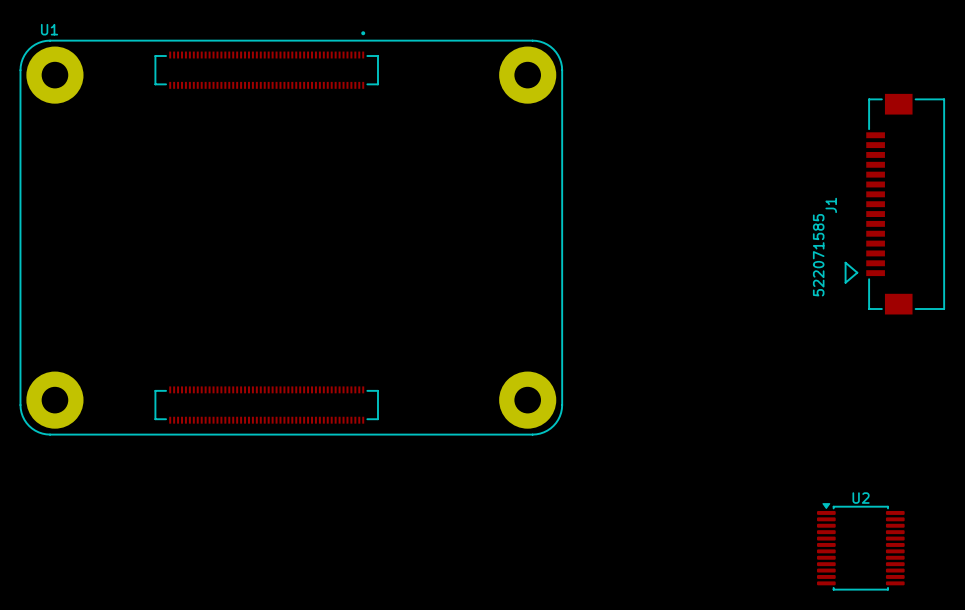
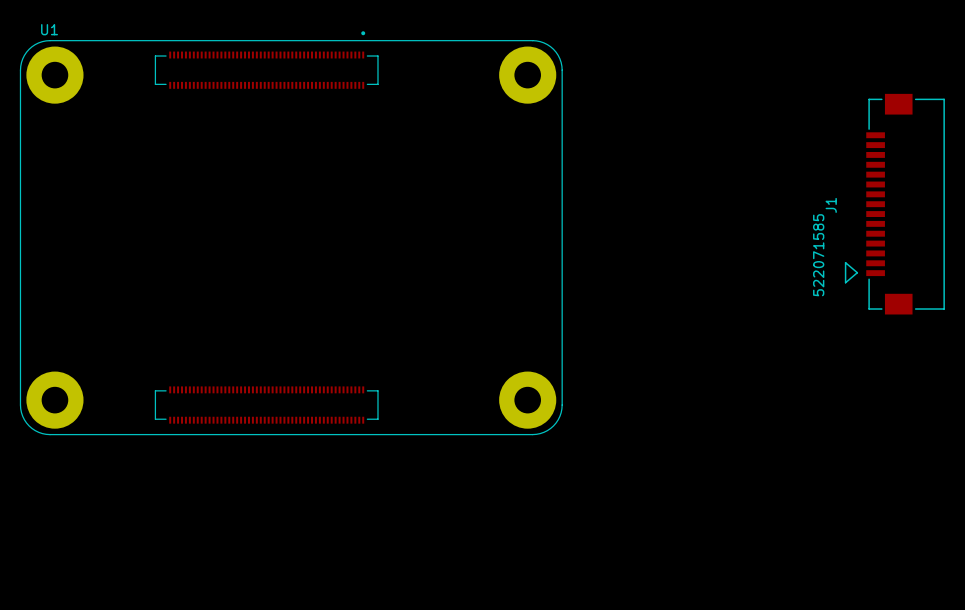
U2: (860, 546) -> none

